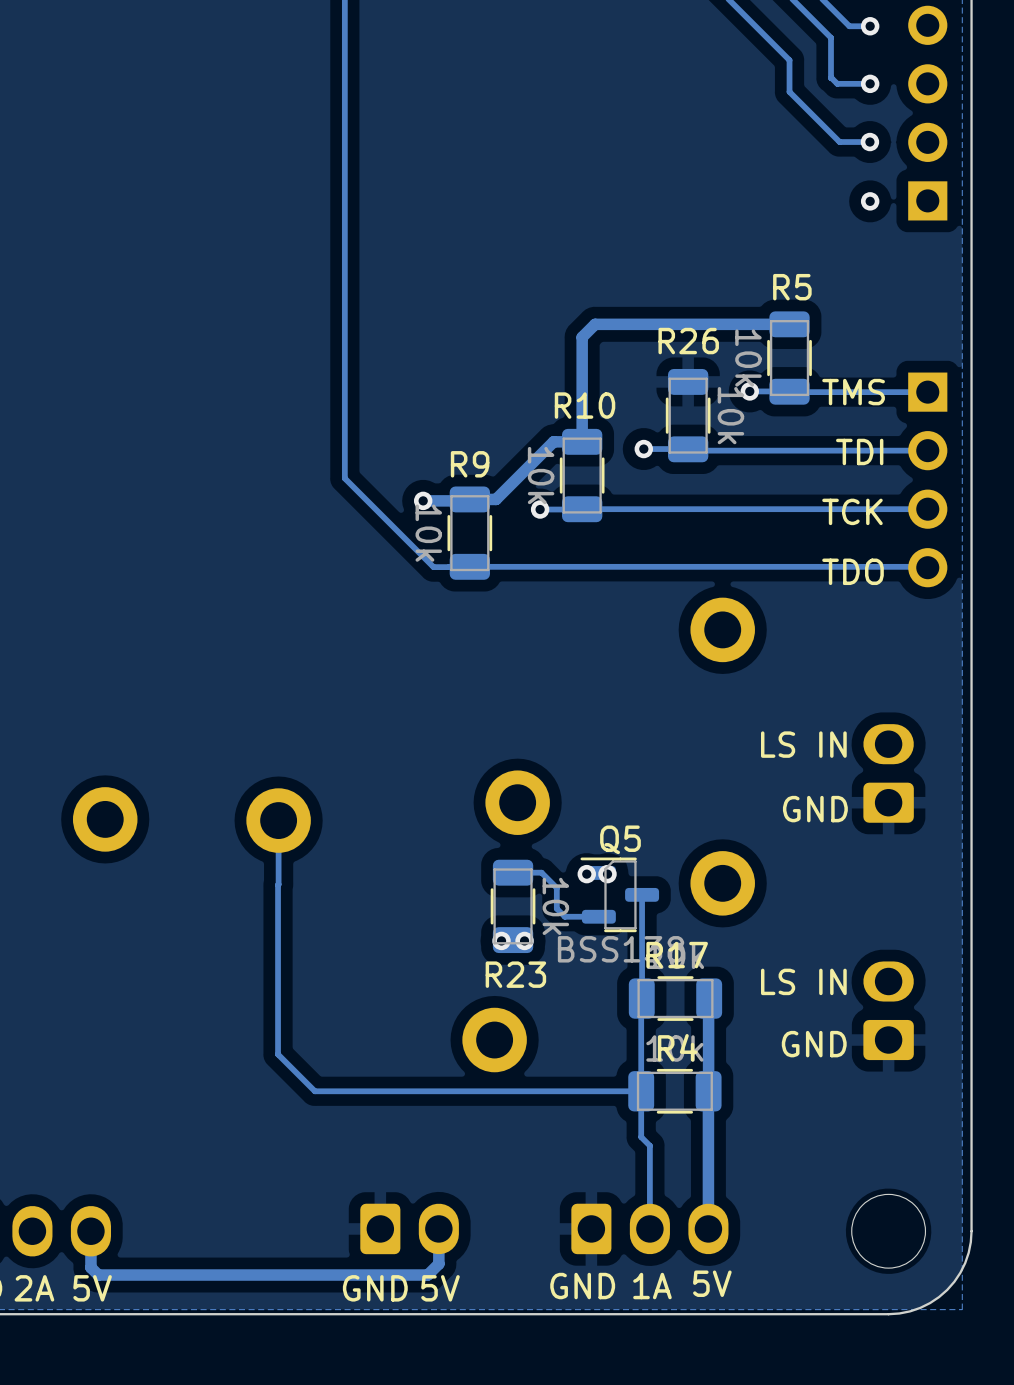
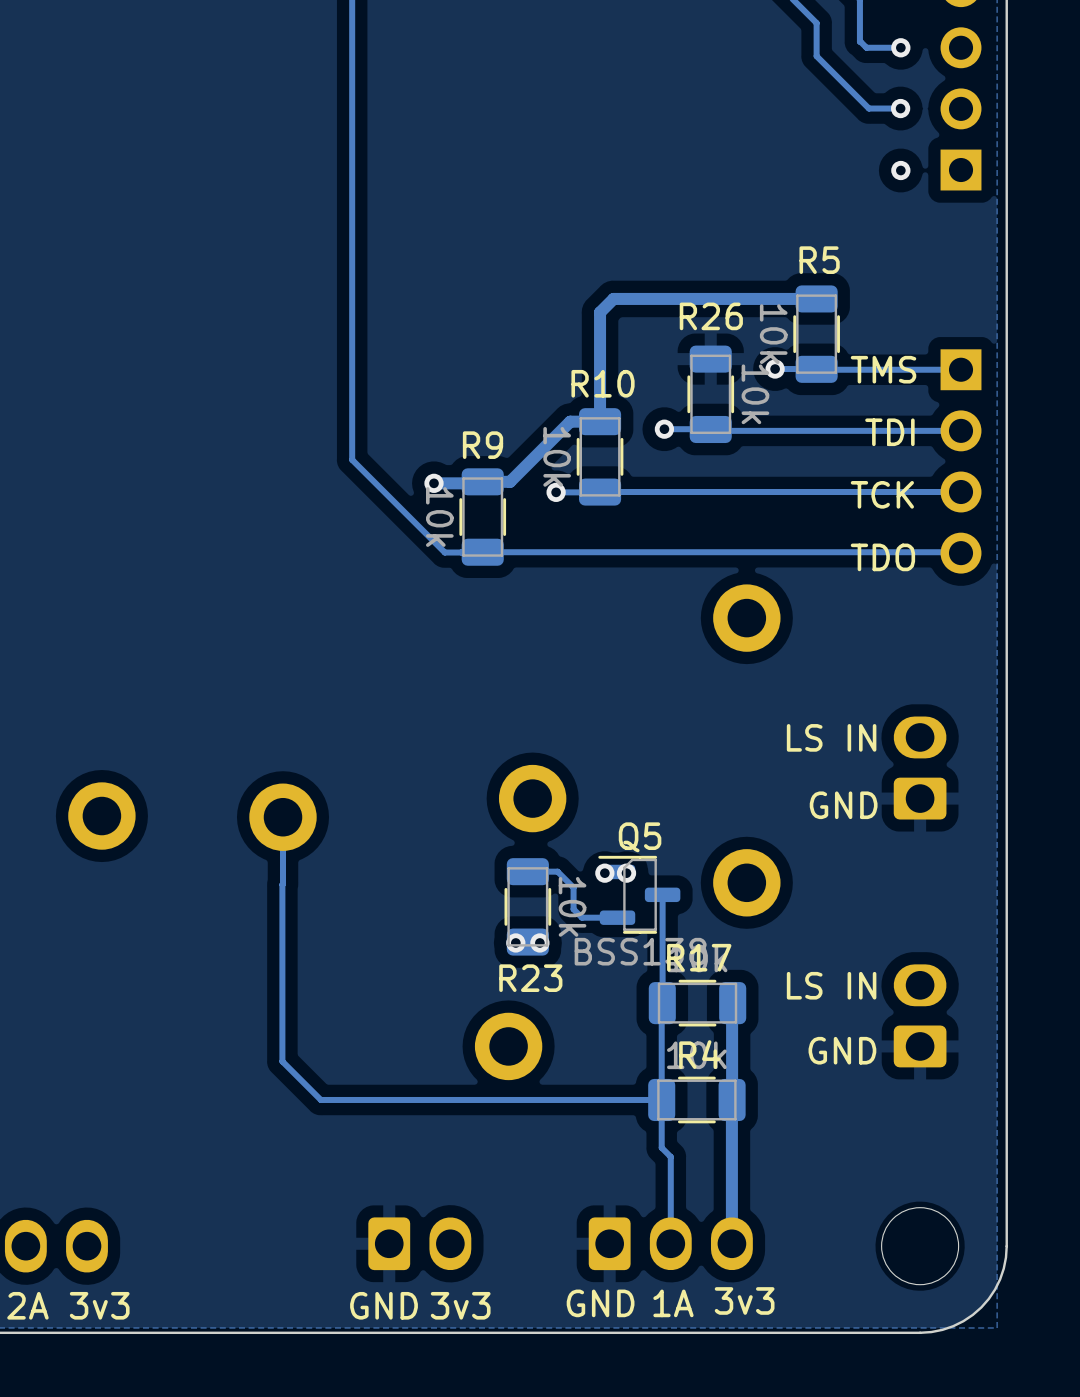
track: (438, 1228) (438, 1263) (427, 1275) (98, 1275) (90, 1267) (90, 1231) -> none
text: 5V (712, 1283) -> 3v3 (744, 1300)
text: 5V (92, 1288) -> 3v3 (99, 1305)
text: 5V (440, 1288) -> 3v3 (460, 1305)

